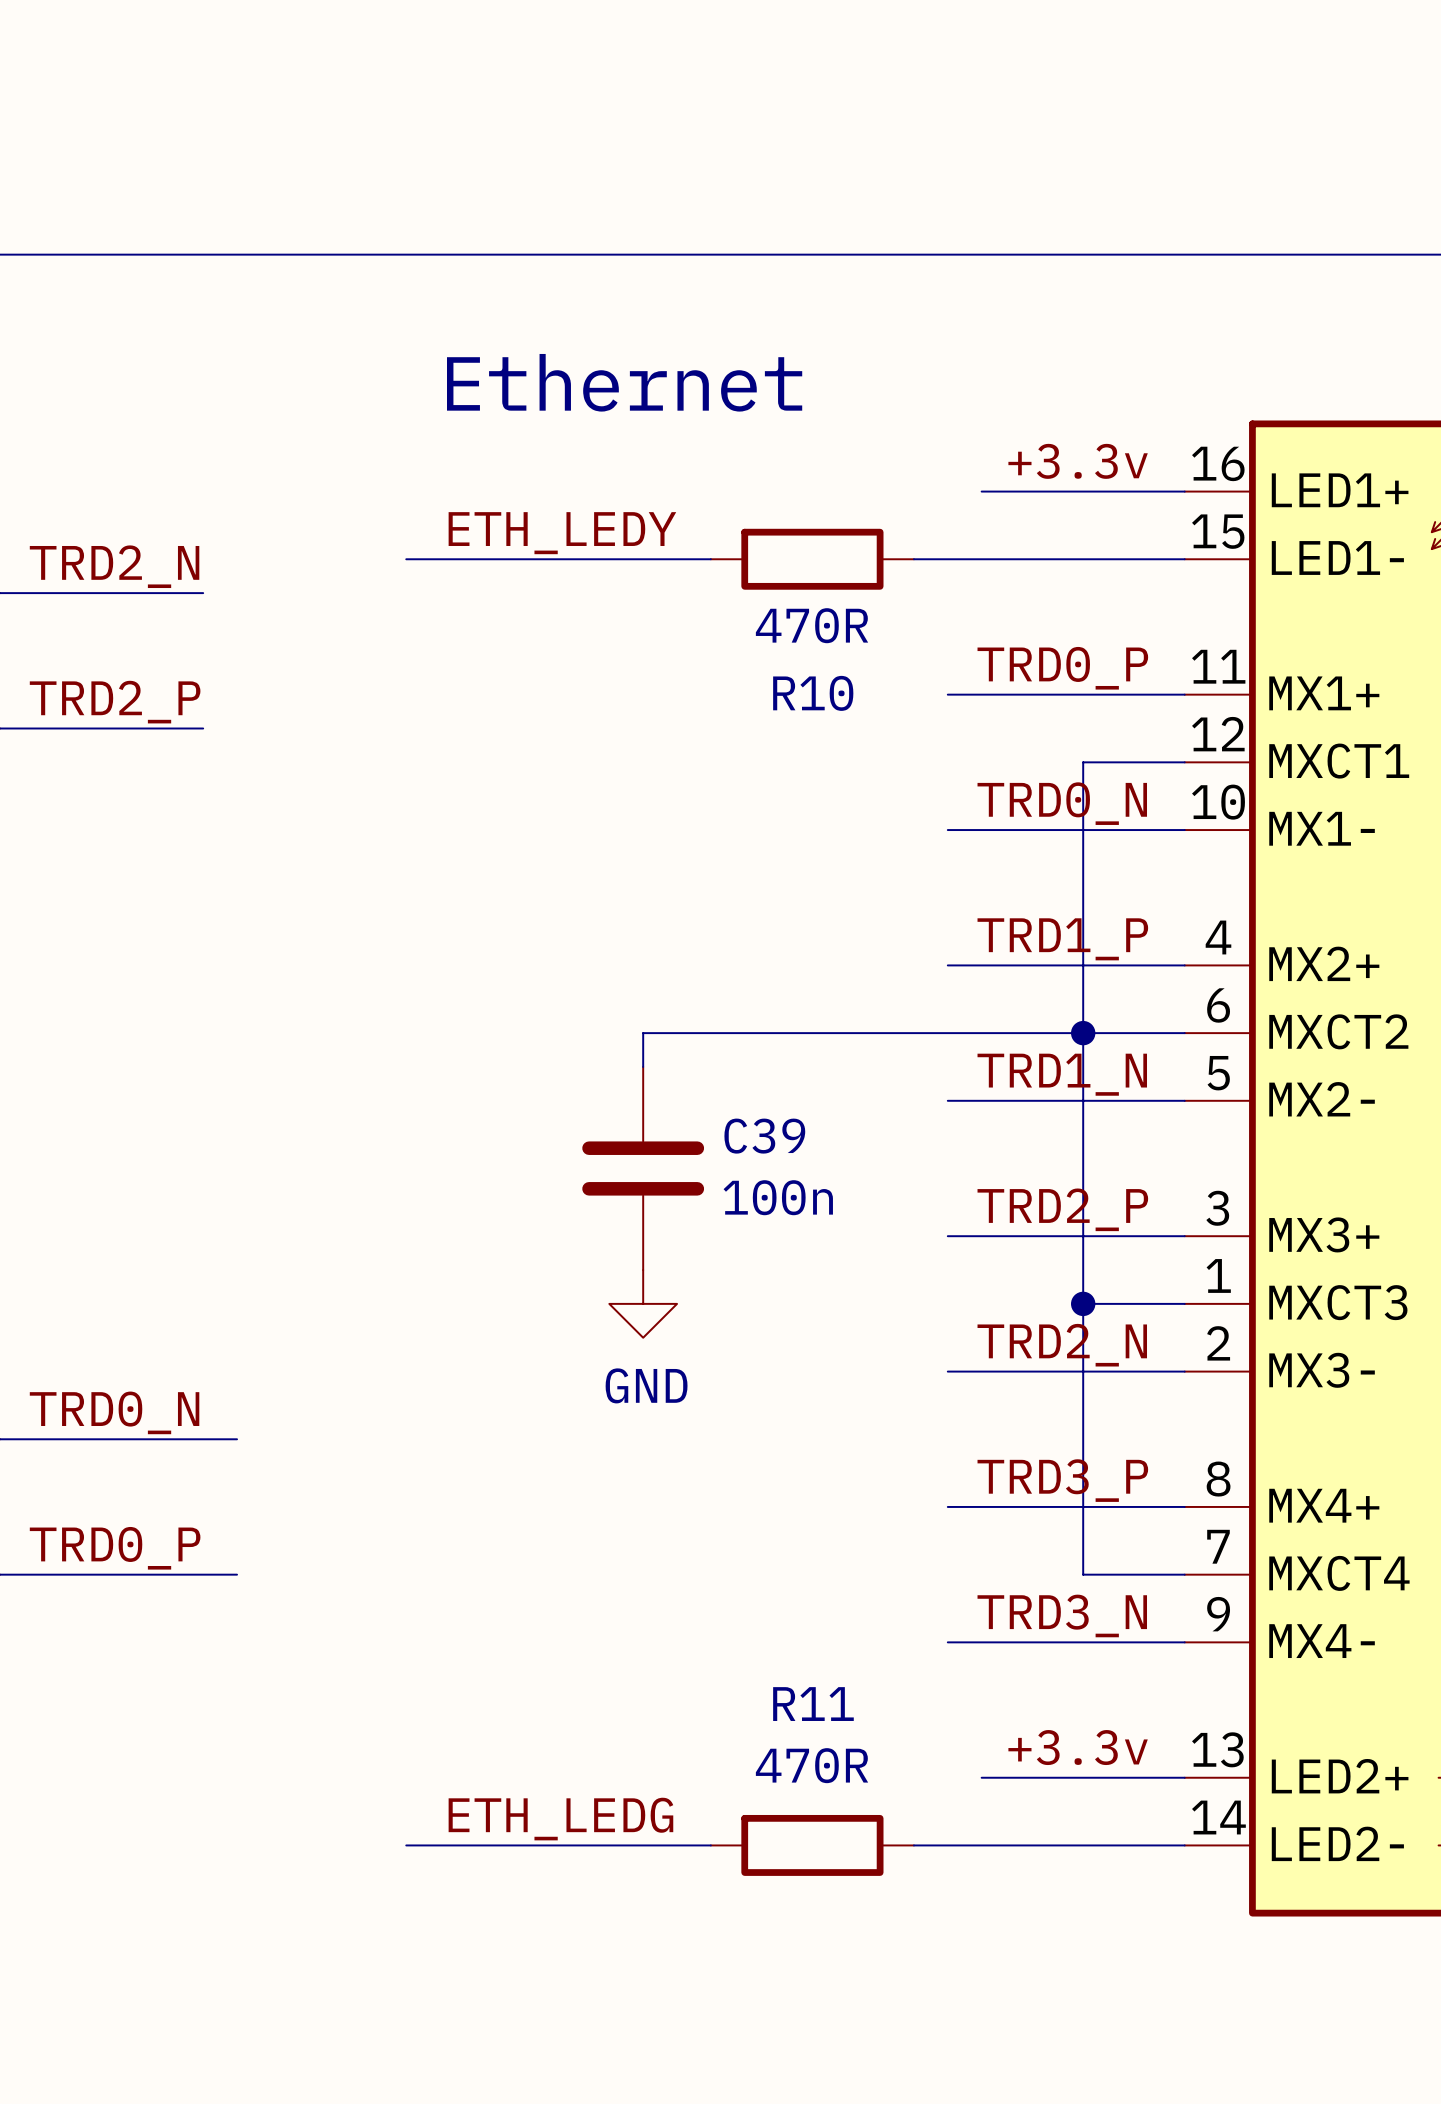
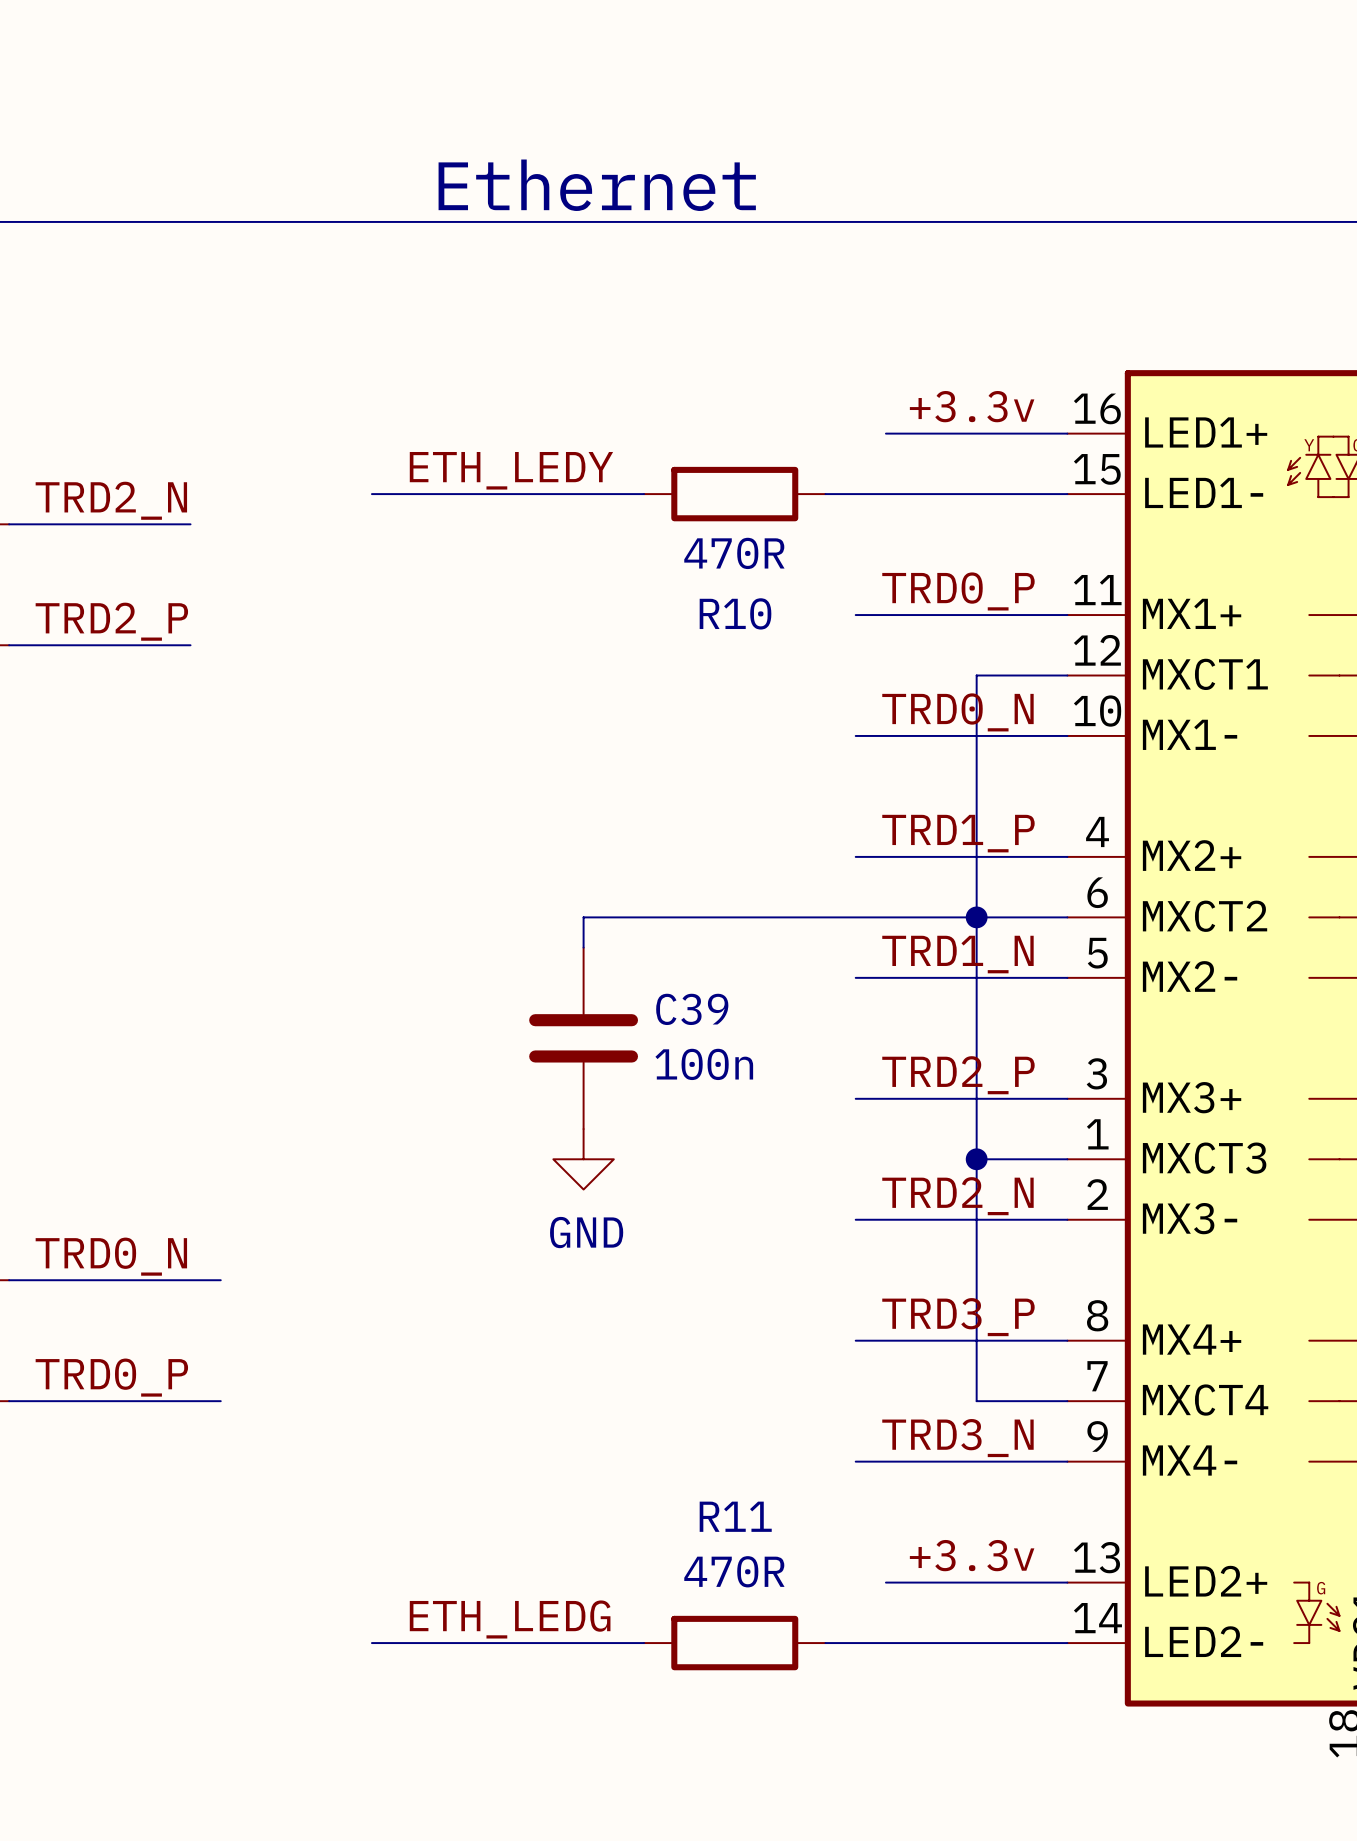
text position: Ethernet (624, 382) -> Ethernet (597, 185)

